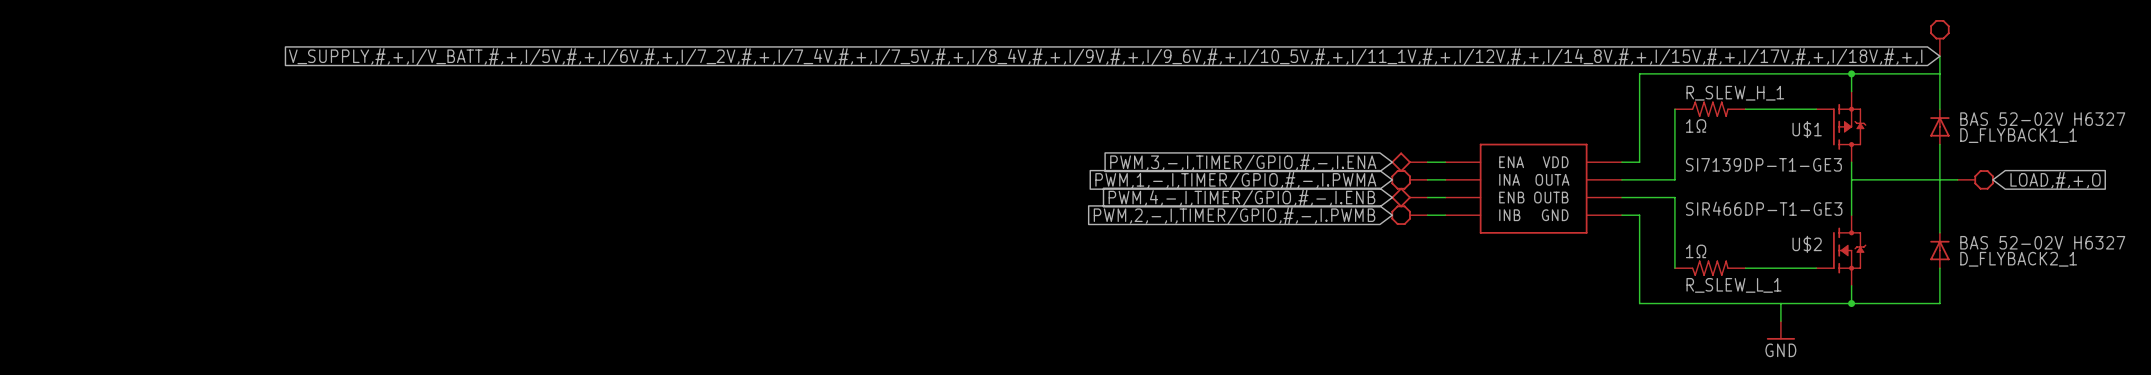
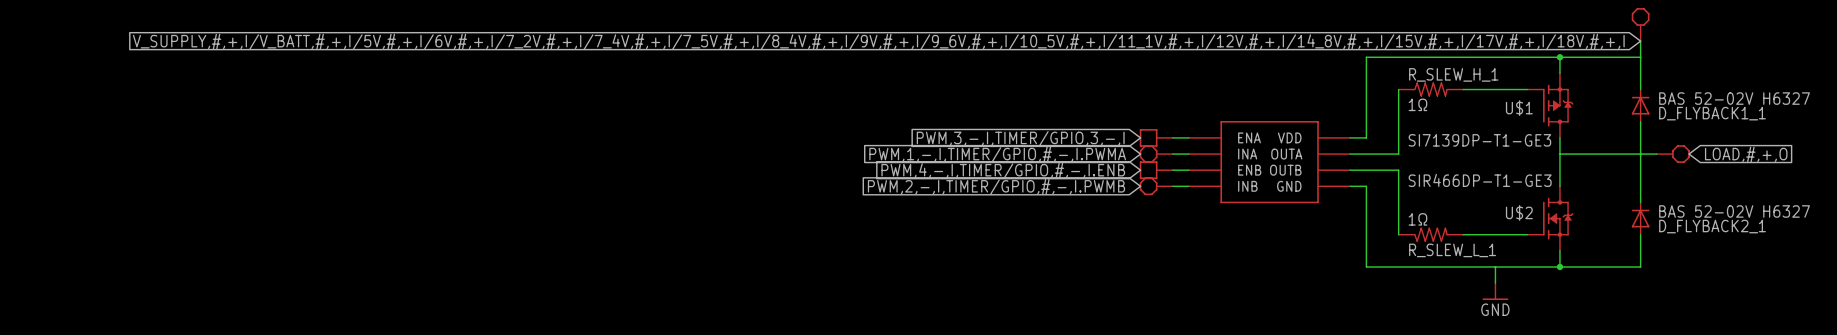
power symbol shape: [1391, 152, 1428, 172] -> [1139, 129, 1173, 147]
global label: PWM,3,-,I,TIMER/GPIO,#,-,I.ENA (1243, 163) -> PWM,3,-,I,TIMER/GPIO,3,-,I (1020, 139)
power symbol shape: [1391, 187, 1428, 208] -> [1139, 161, 1173, 180]

